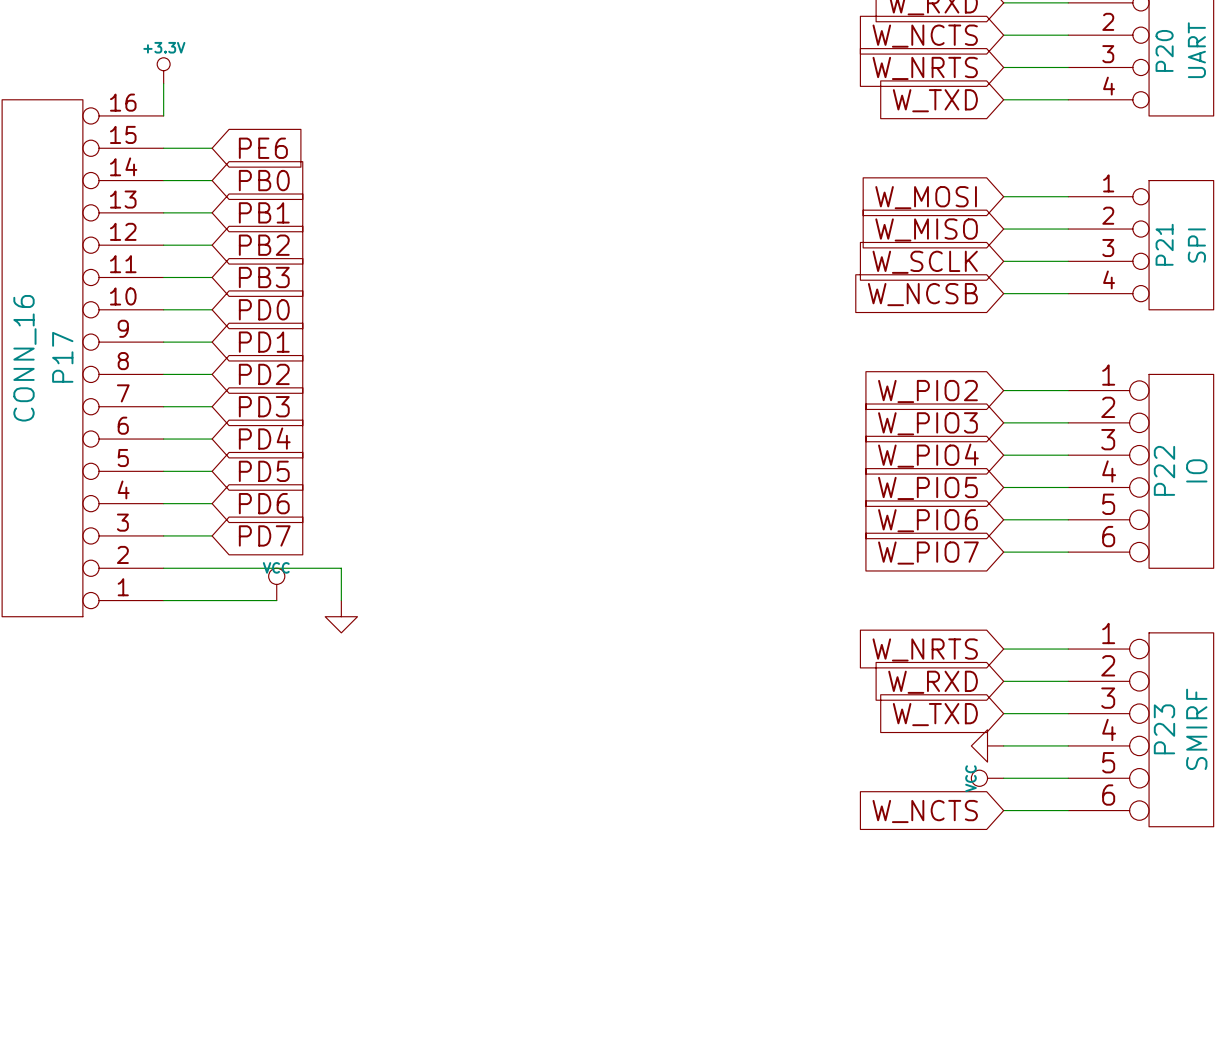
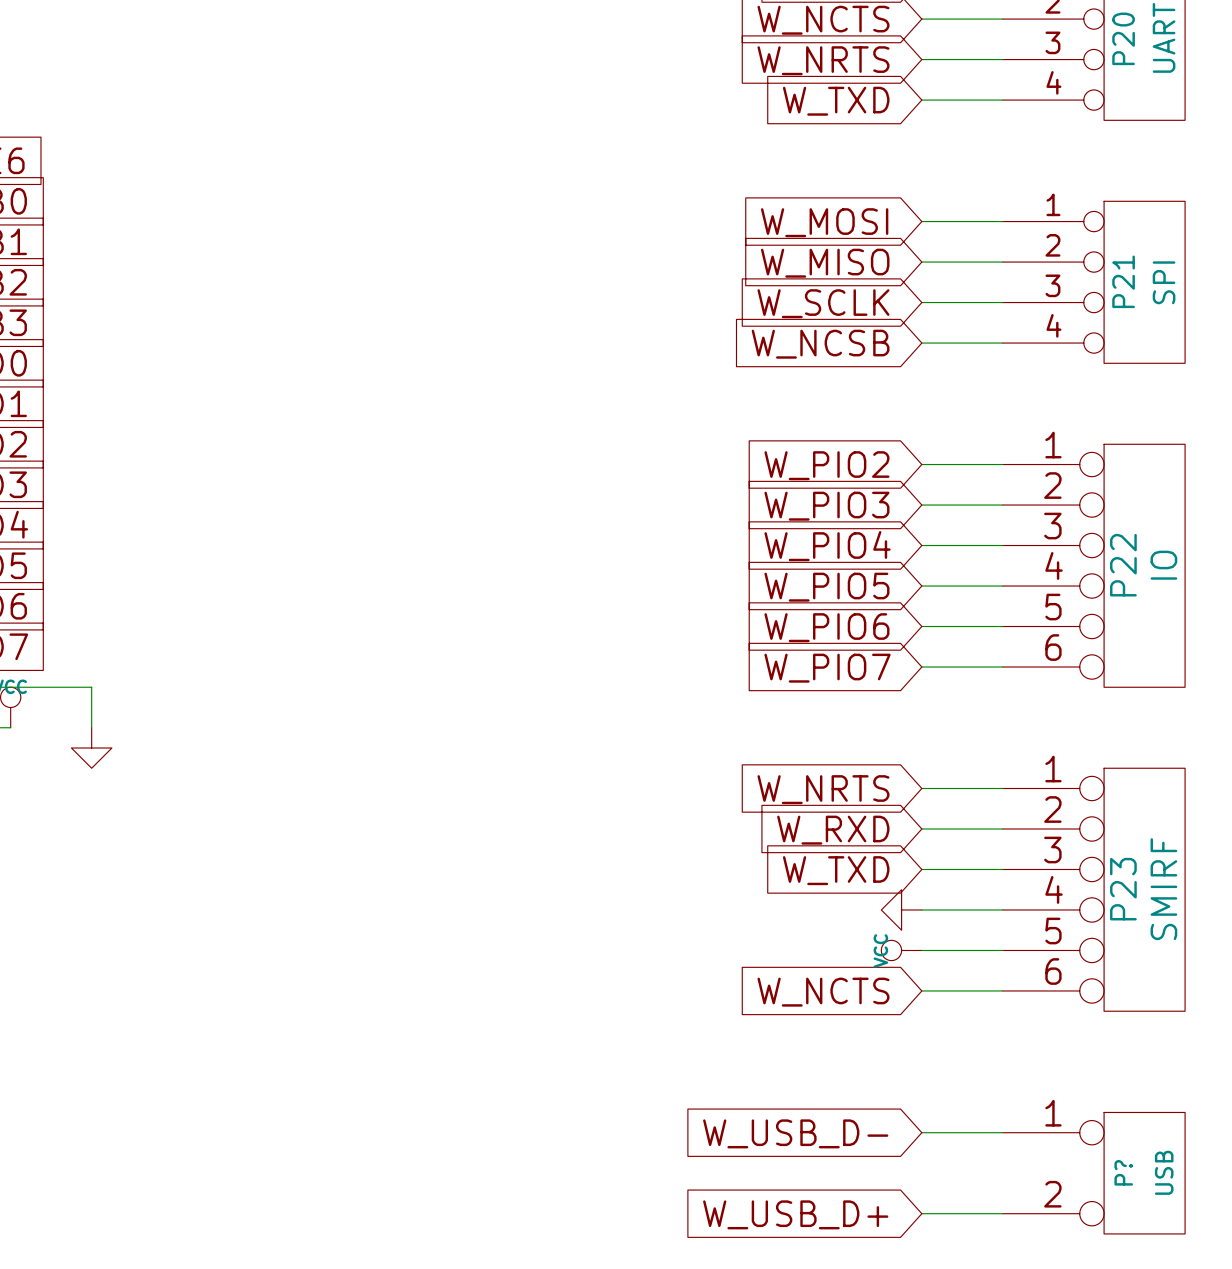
wire: none -> (921, 1132) (1002, 1132)
global label: none -> W_USB_D- (795, 1133)
P?: none -> USB (1093, 1173)
wire: none -> (921, 1213) (1002, 1213)
global label: none -> W_USB_D+ (795, 1214)

